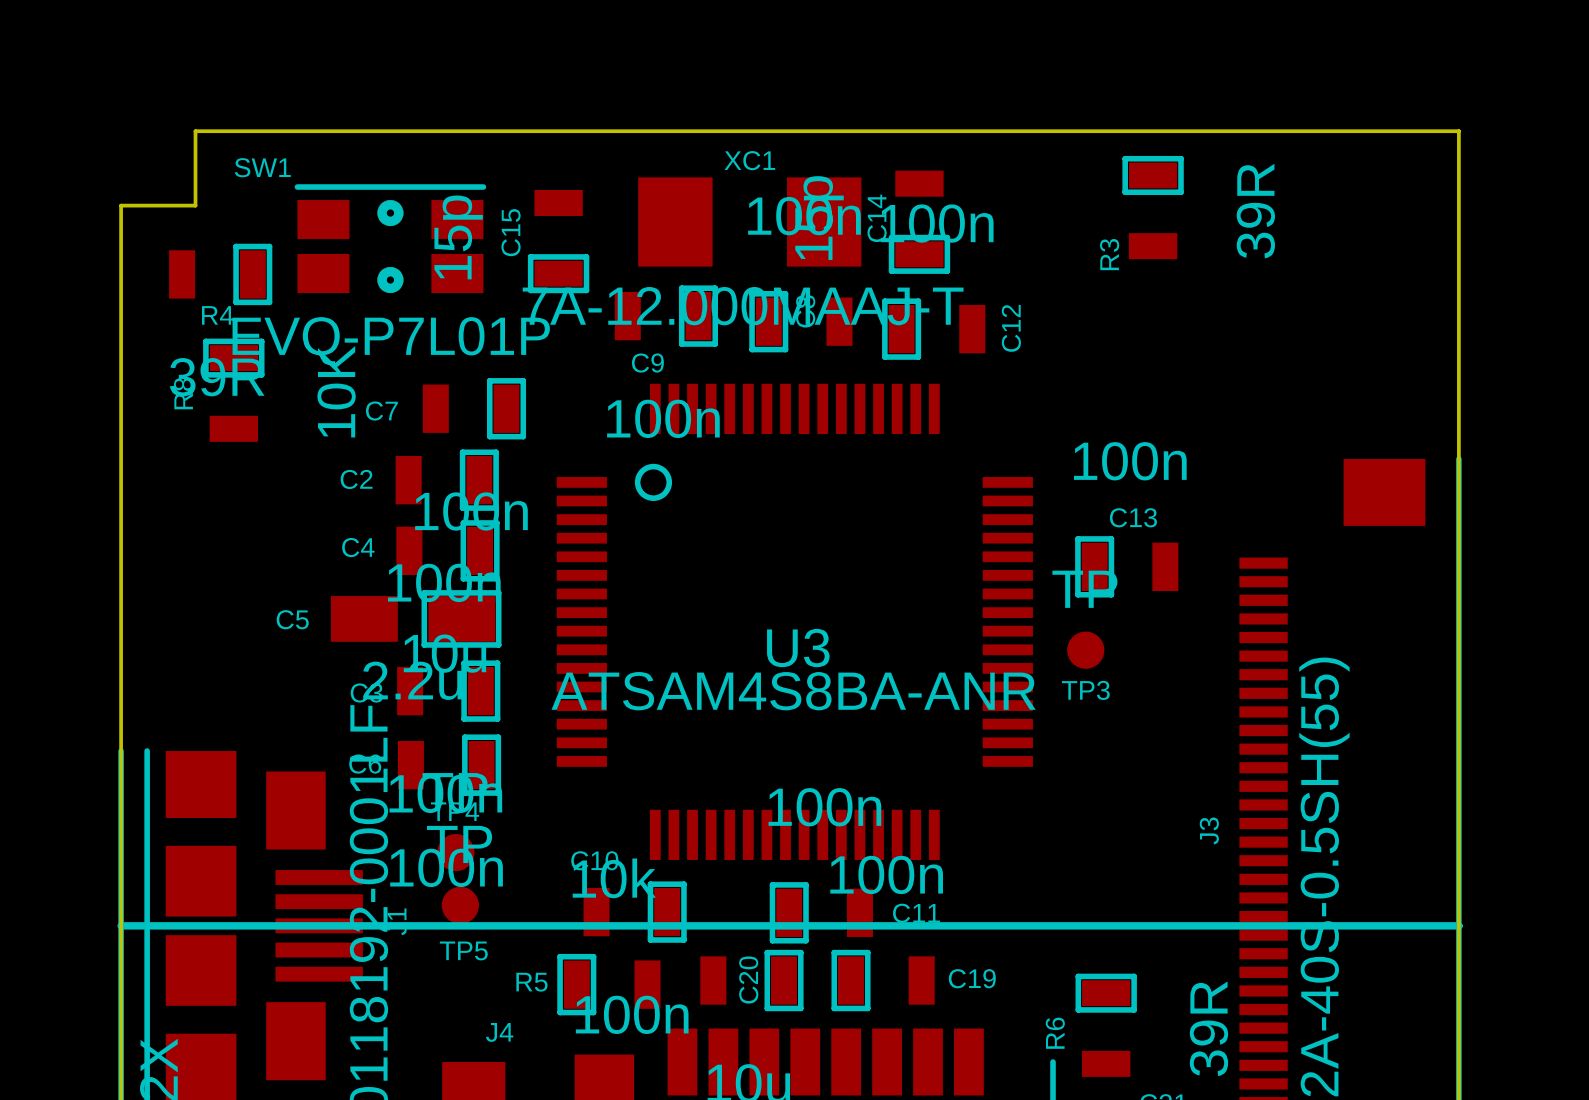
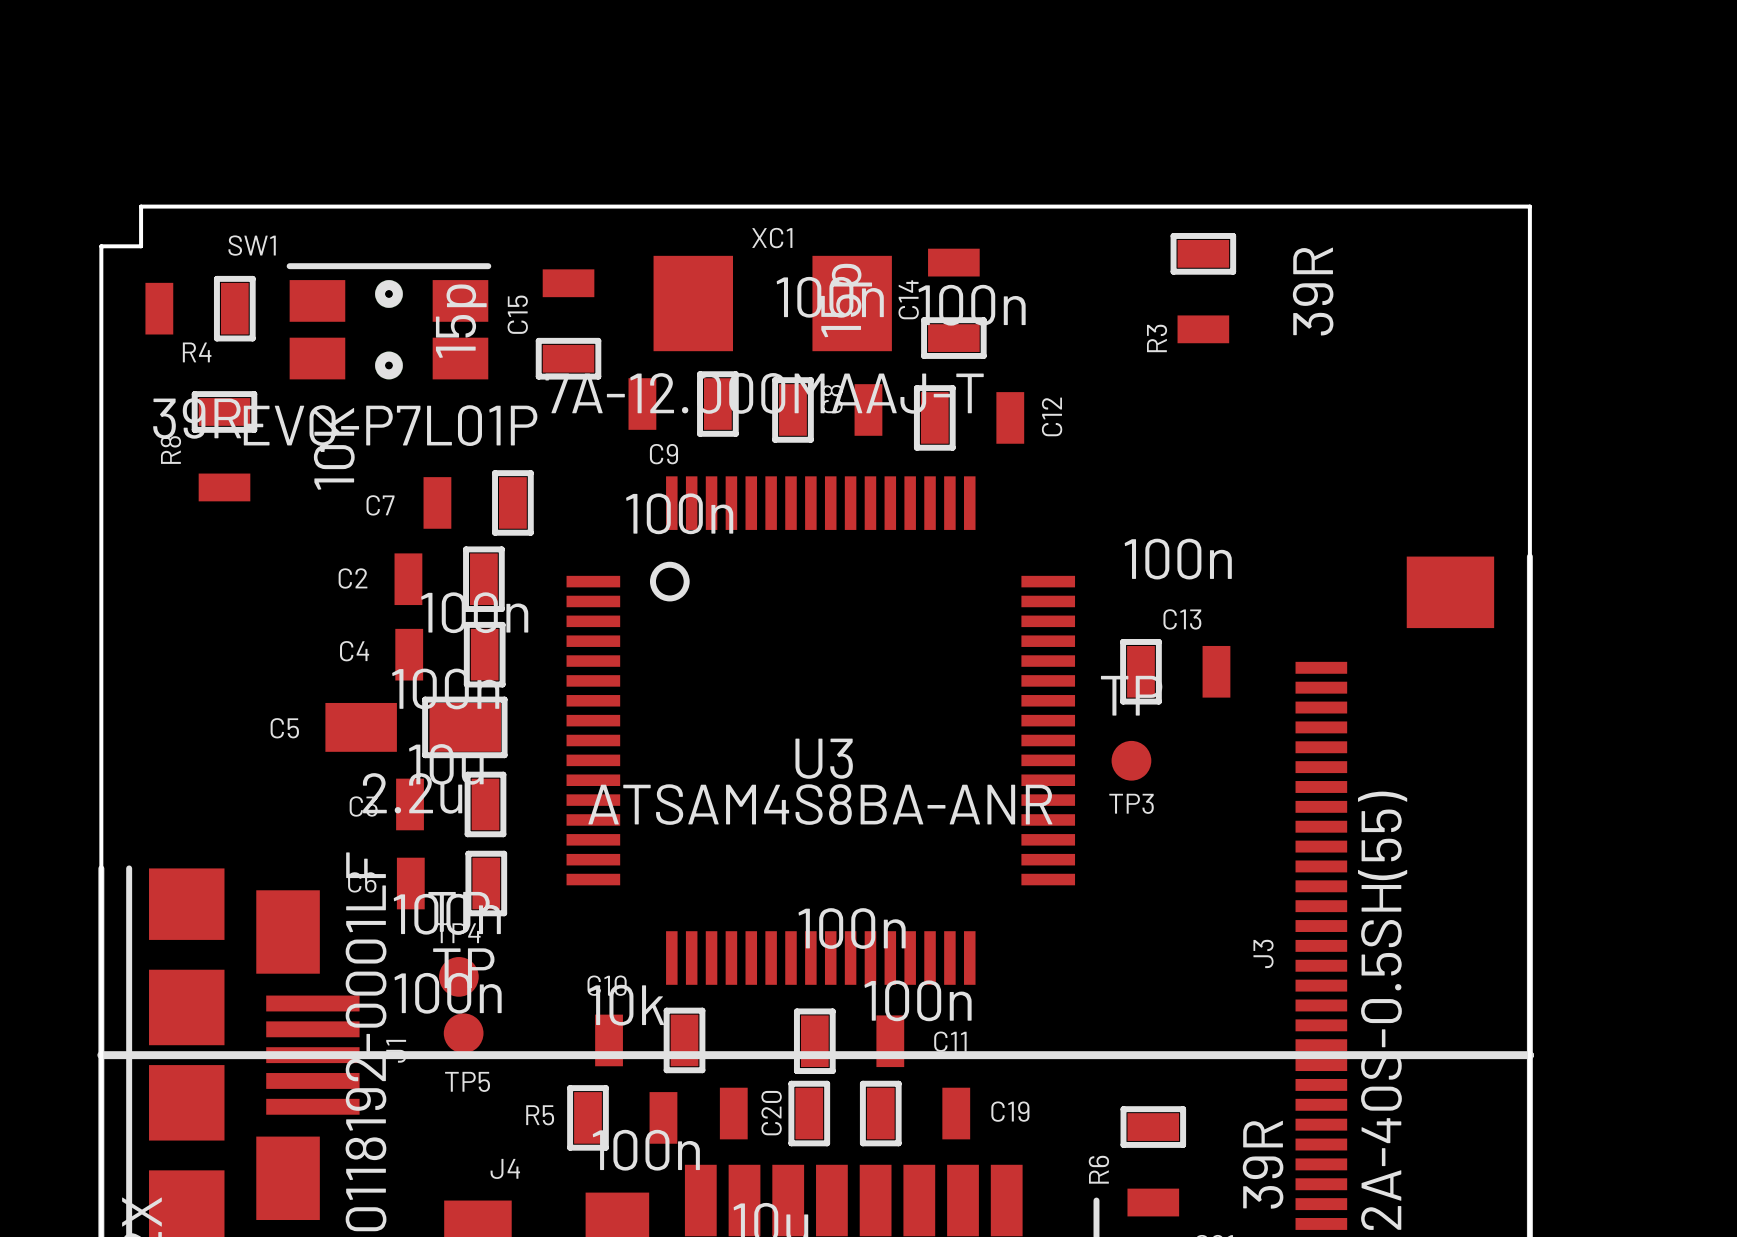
board edge: (195, 131) (195, 205) (121, 205) -> (180, 206) (141, 206) (141, 246) (101, 246) (101, 286)
R4 position: (220, 274) -> (200, 308)
R8 position: (233, 390) -> (224, 446)

